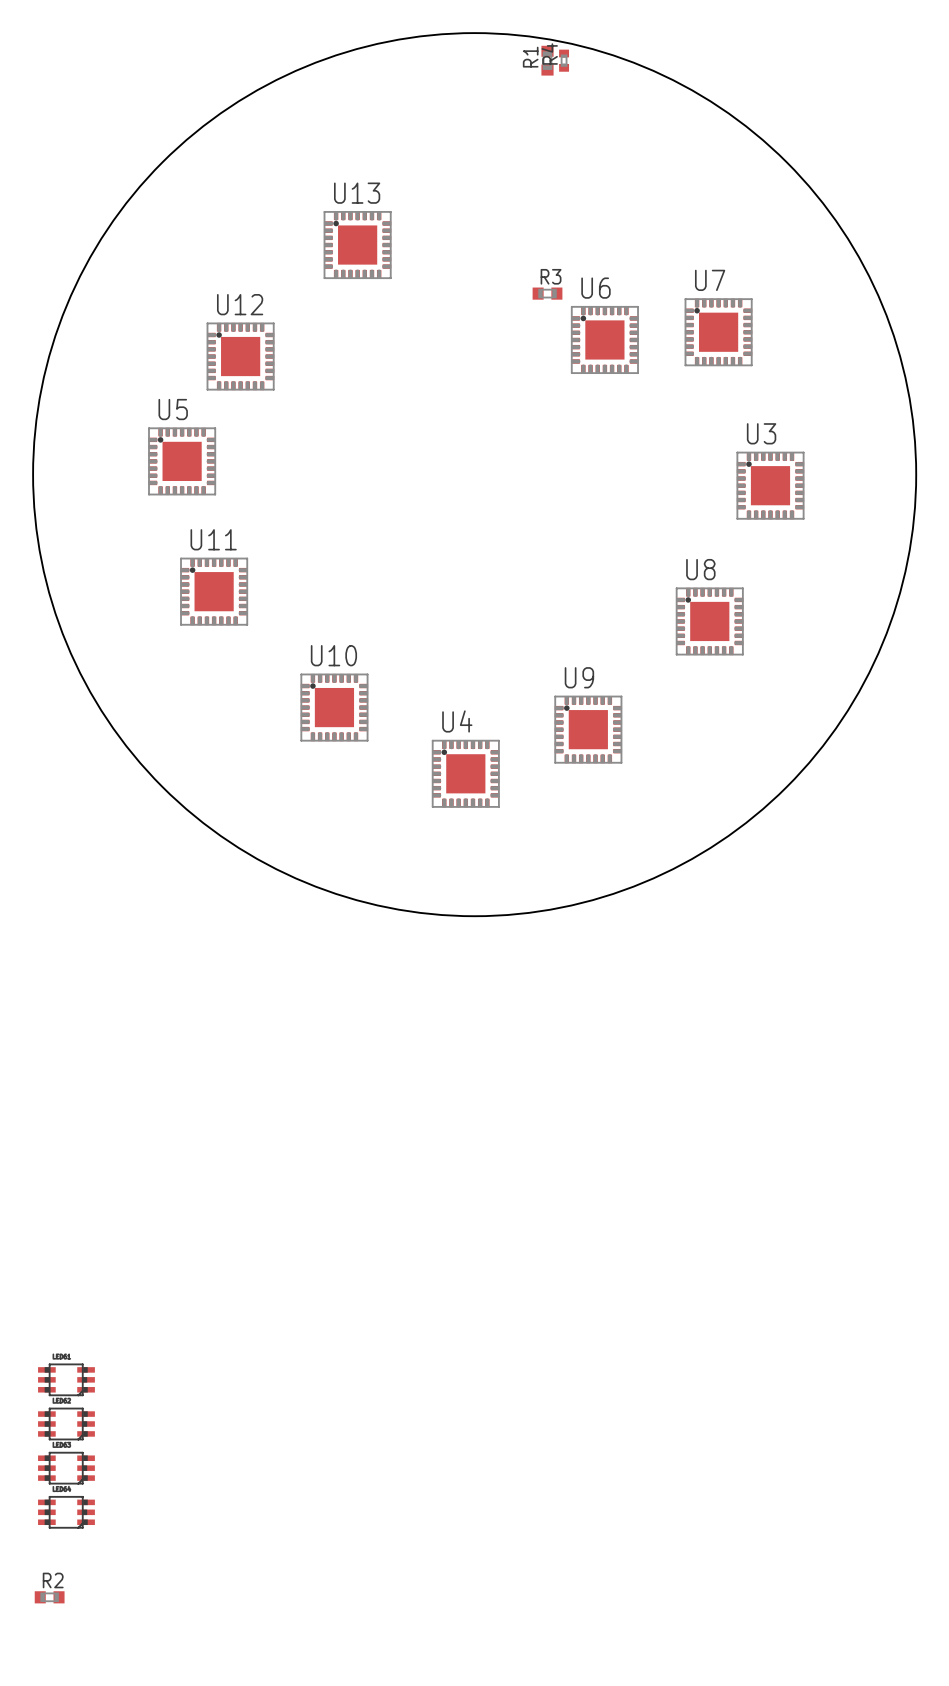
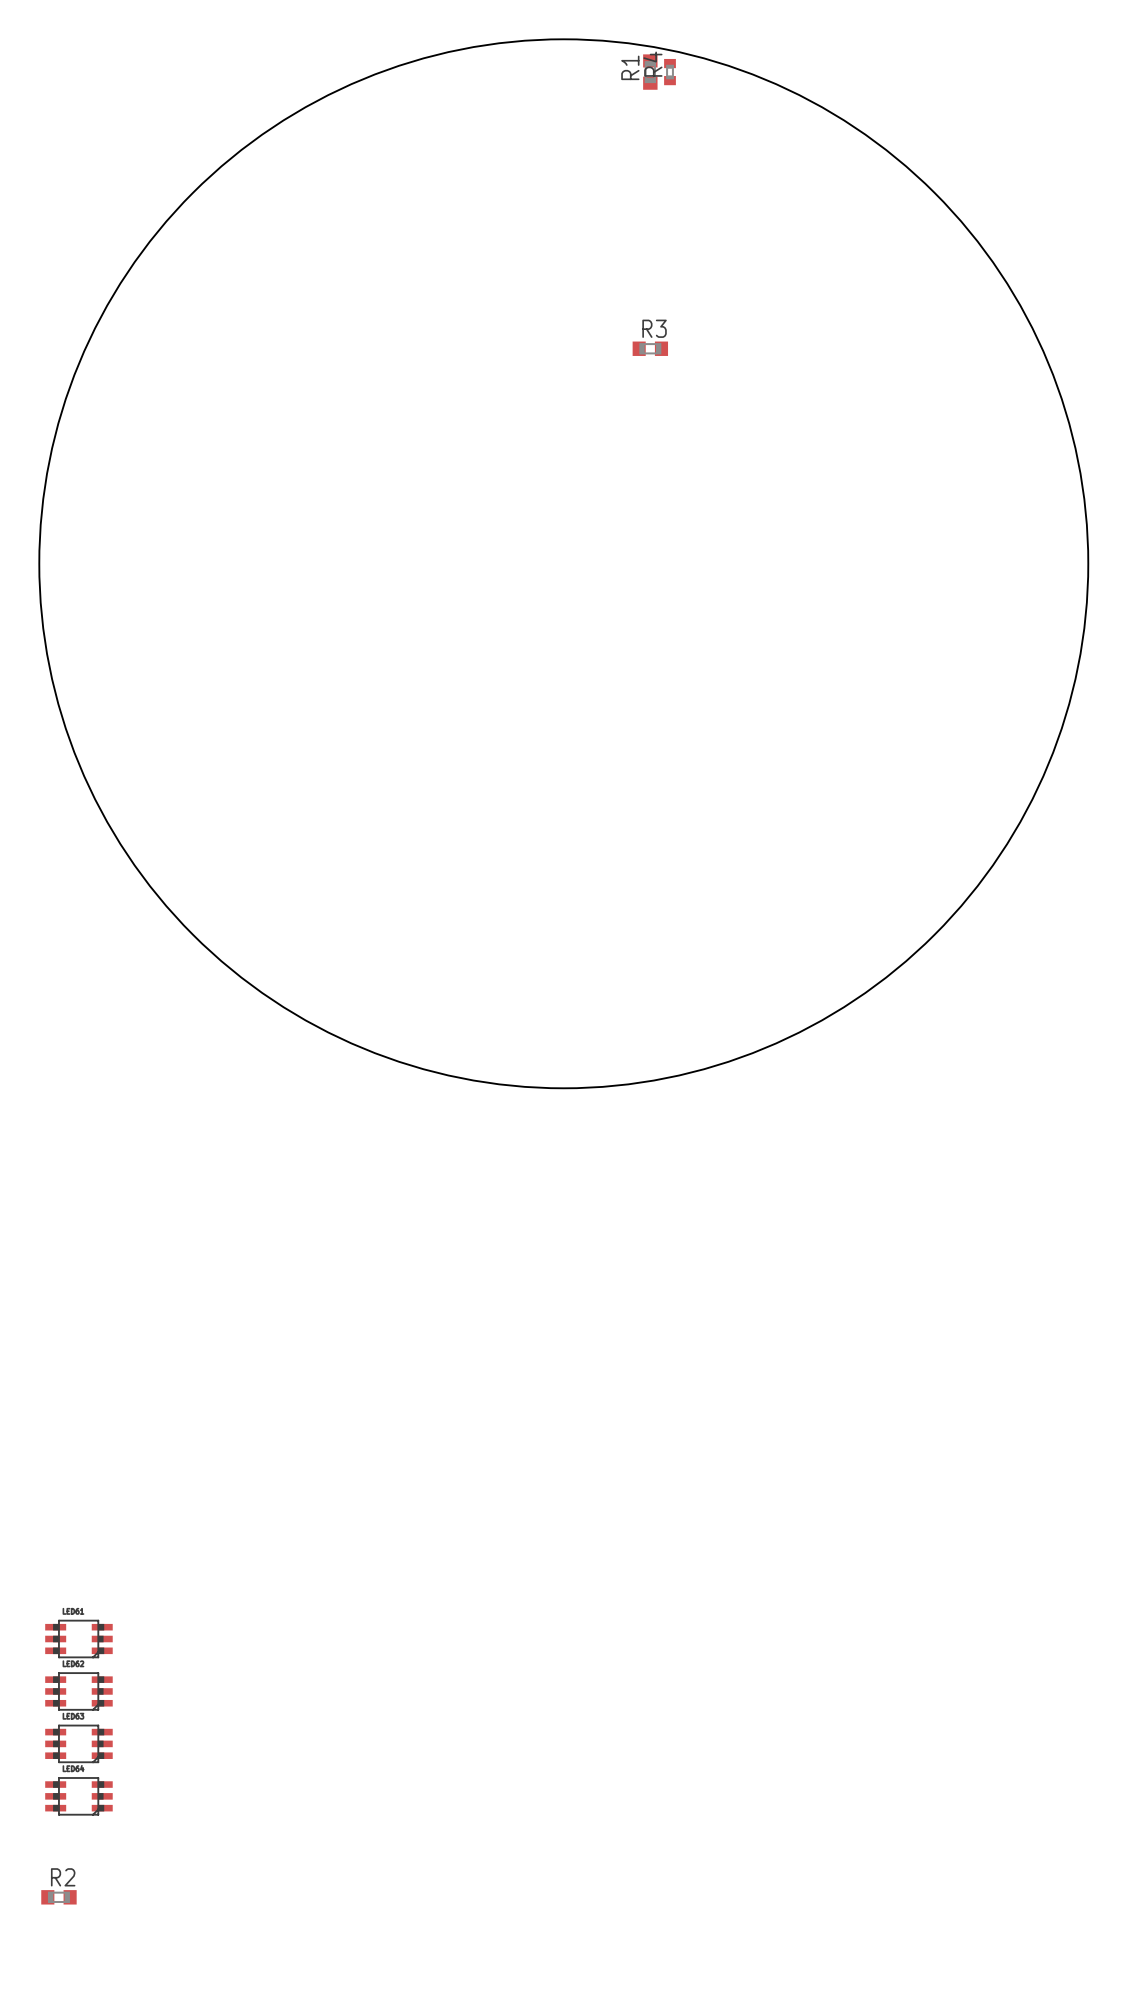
U13: (357, 245) -> none
U7: (718, 332) -> none
U6: (604, 339) -> none
U12: (240, 356) -> none
U5: (182, 461) -> none
U3: (770, 485) -> none
U11: (214, 591) -> none
U8: (709, 621) -> none
U10: (334, 707) -> none
U9: (588, 729) -> none
U4: (465, 773) -> none

